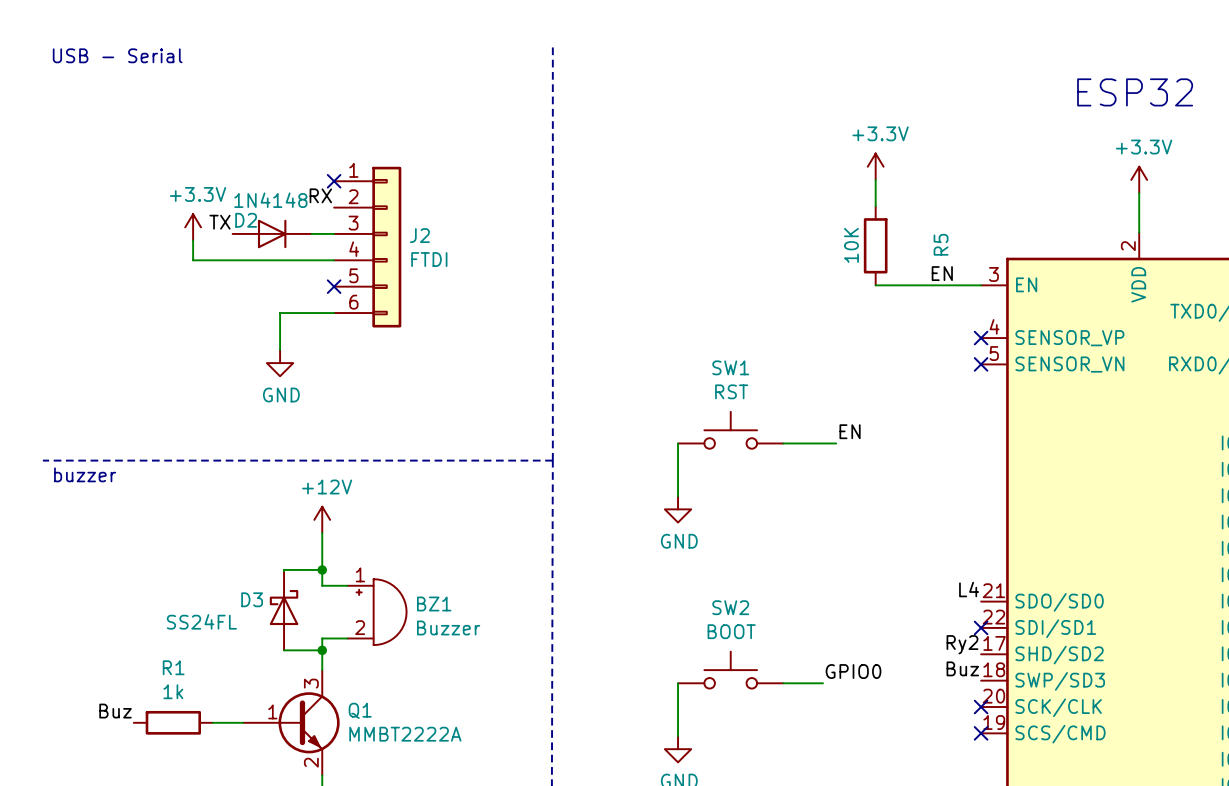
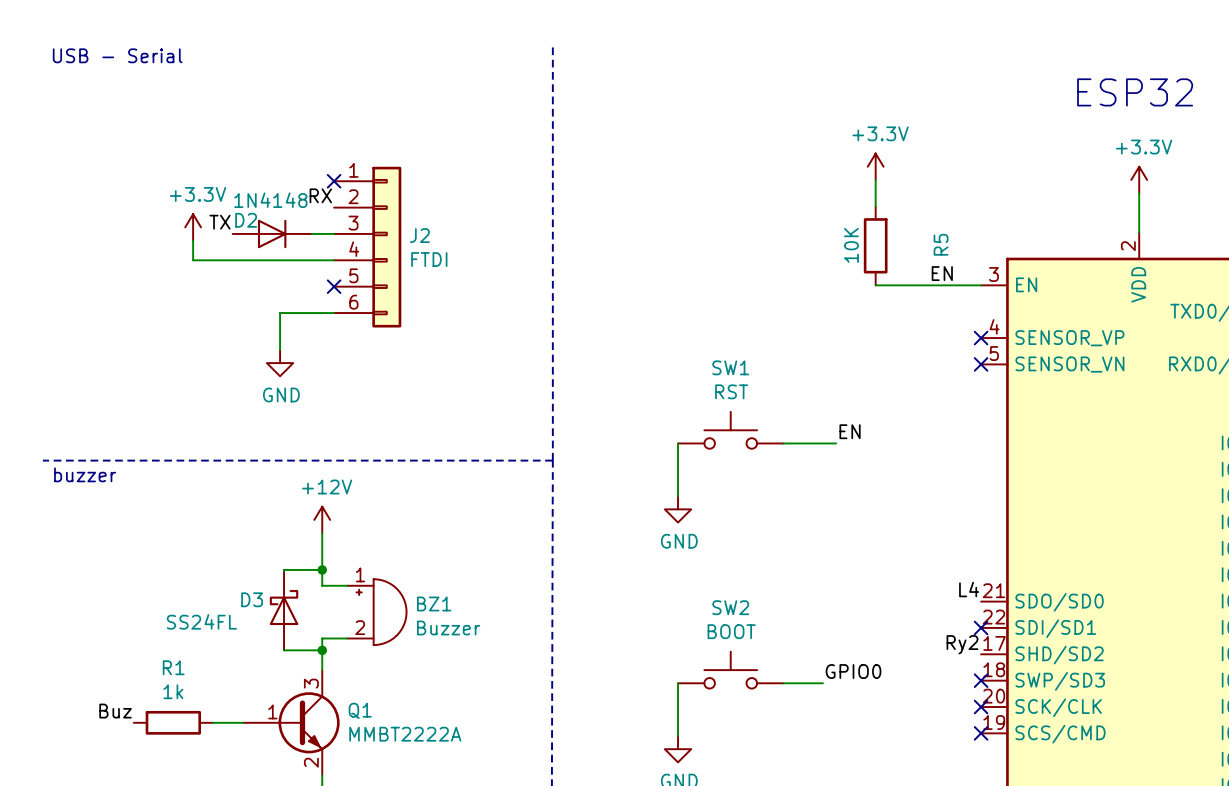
label: Buz (962, 668) -> none
no-connect mark: none -> (981, 680)

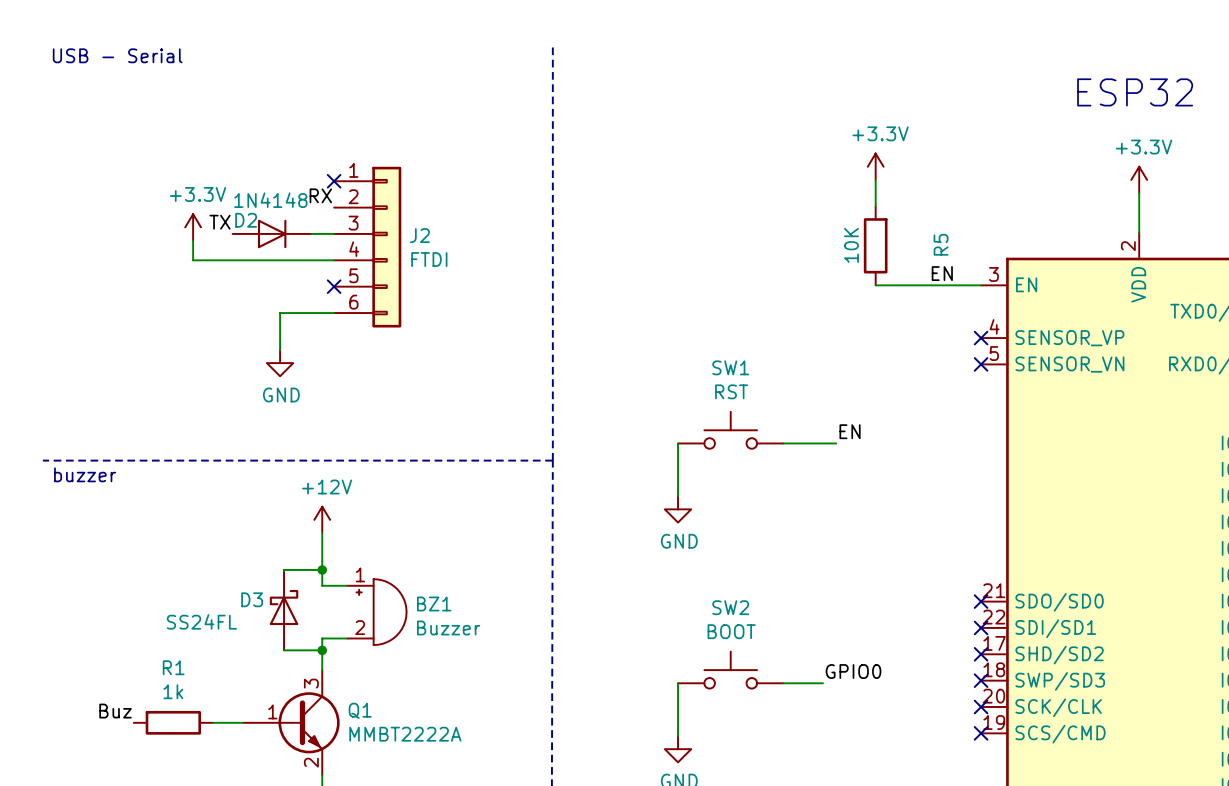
label: L4 (969, 589) -> none
no-connect mark: none -> (981, 601)
label: Ry2 (962, 644) -> none
no-connect mark: none -> (981, 654)

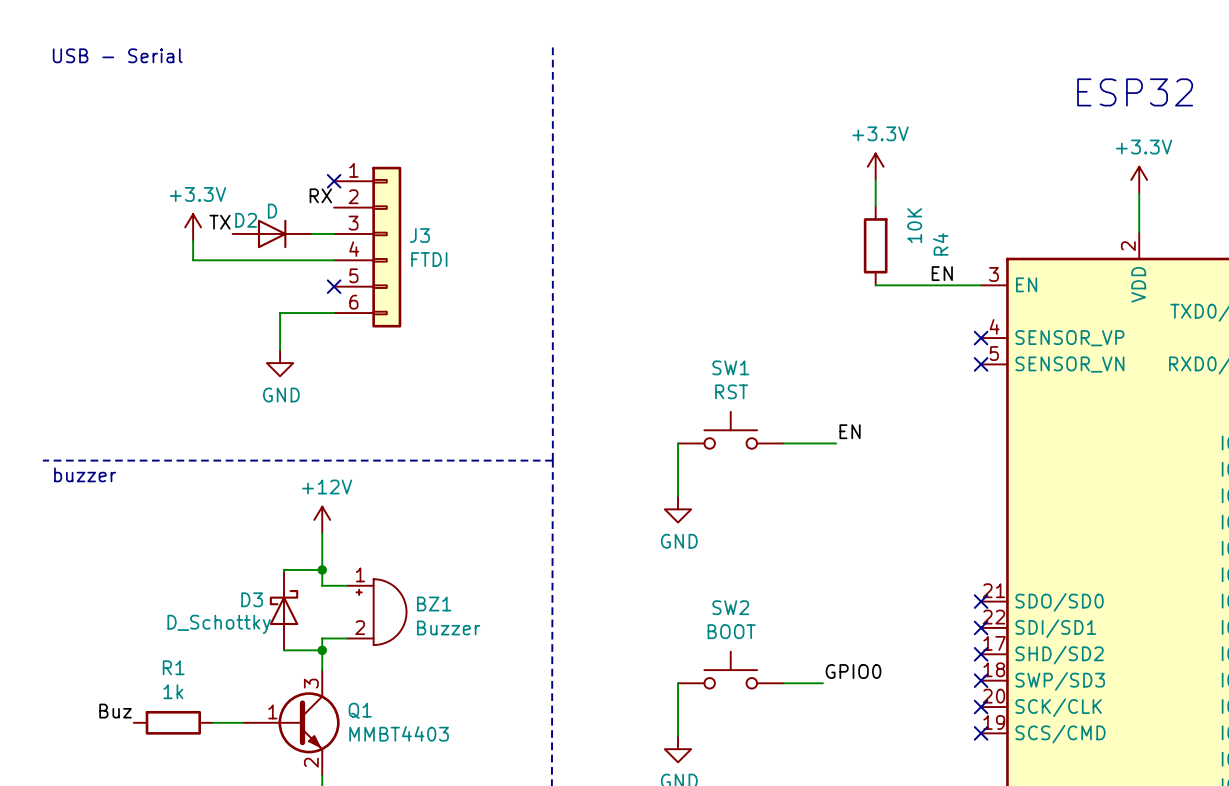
D2 value: 1N4148 (270, 200) -> D (272, 211)
J2 name: J2 (419, 235) -> J3 (419, 235)
R5 name: R5 (941, 244) -> R4 (940, 244)
R5 value position: 10K (851, 245) -> 10K (914, 225)
D3 value: SS24FL (201, 621) -> D_Schottky (219, 624)
Q1 value: MMBT2222A (405, 734) -> MMBT4403 (399, 733)

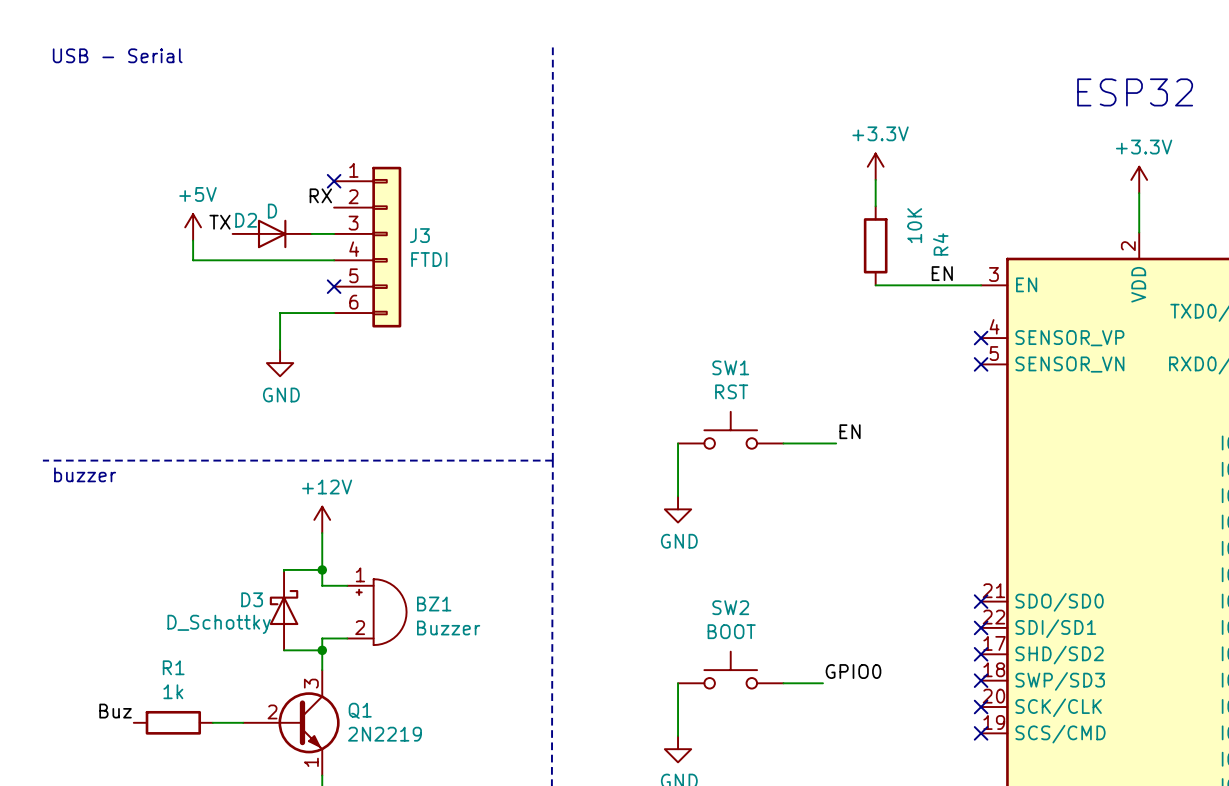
power symbol: +3.3V (193, 227) -> +5V (193, 227)
Q1 pin number: 1 (272, 711) -> 2 (272, 711)
Q1 value: MMBT4403 (399, 733) -> 2N2219 (384, 734)
Q1 pin number: 2 (311, 762) -> 1 (311, 762)

